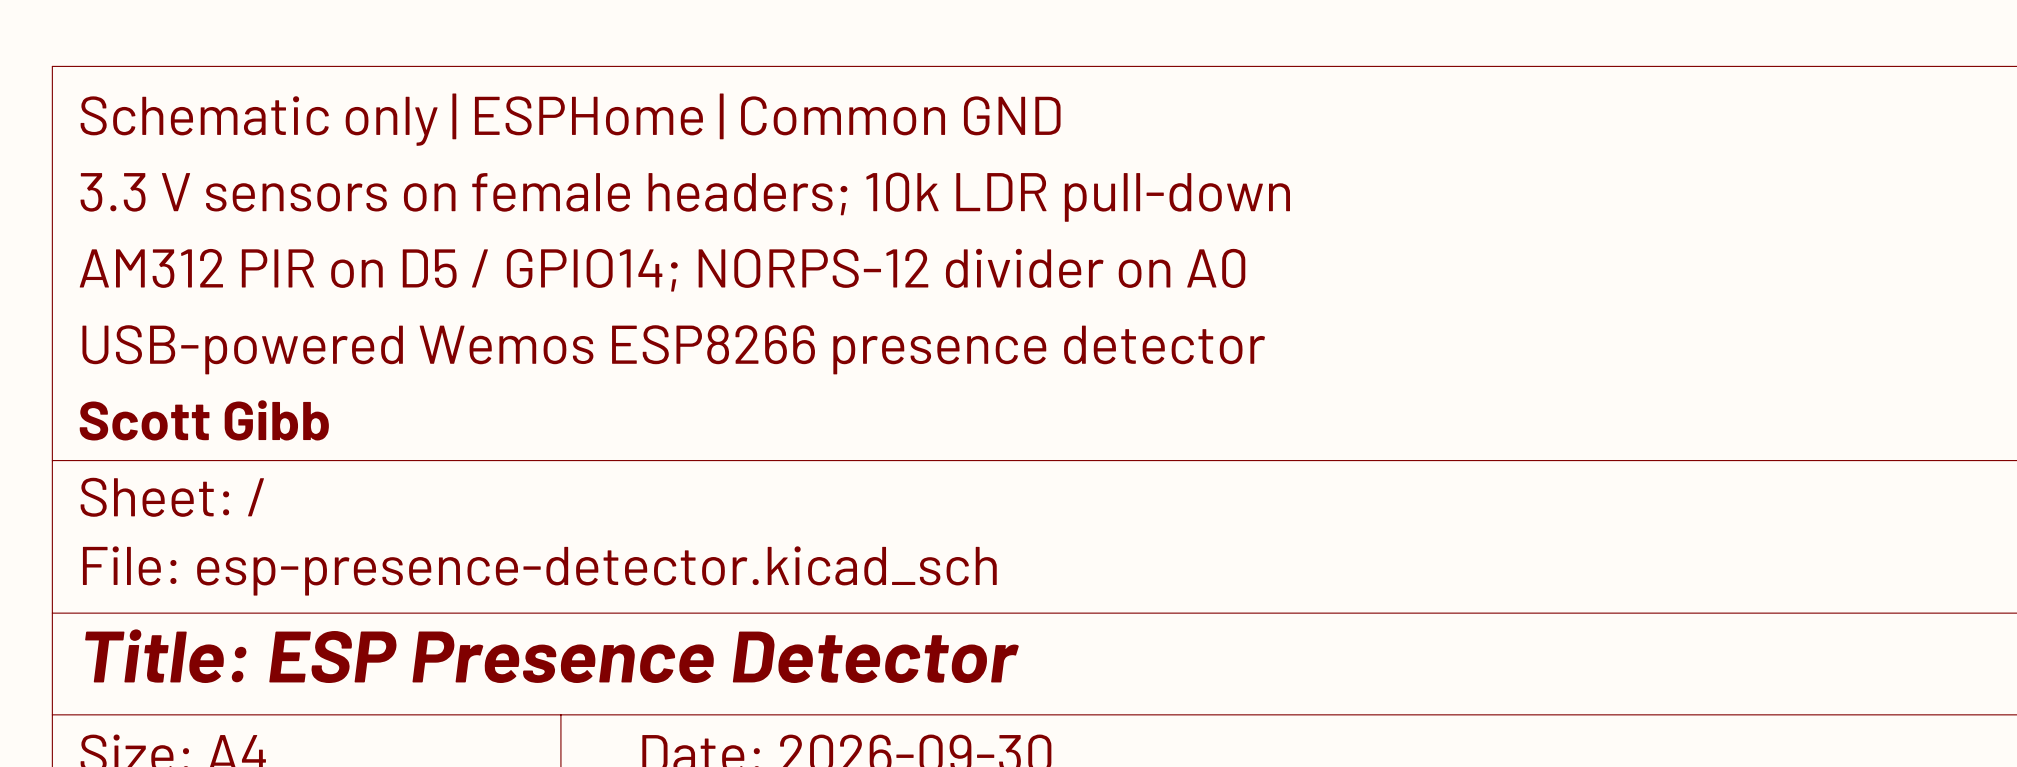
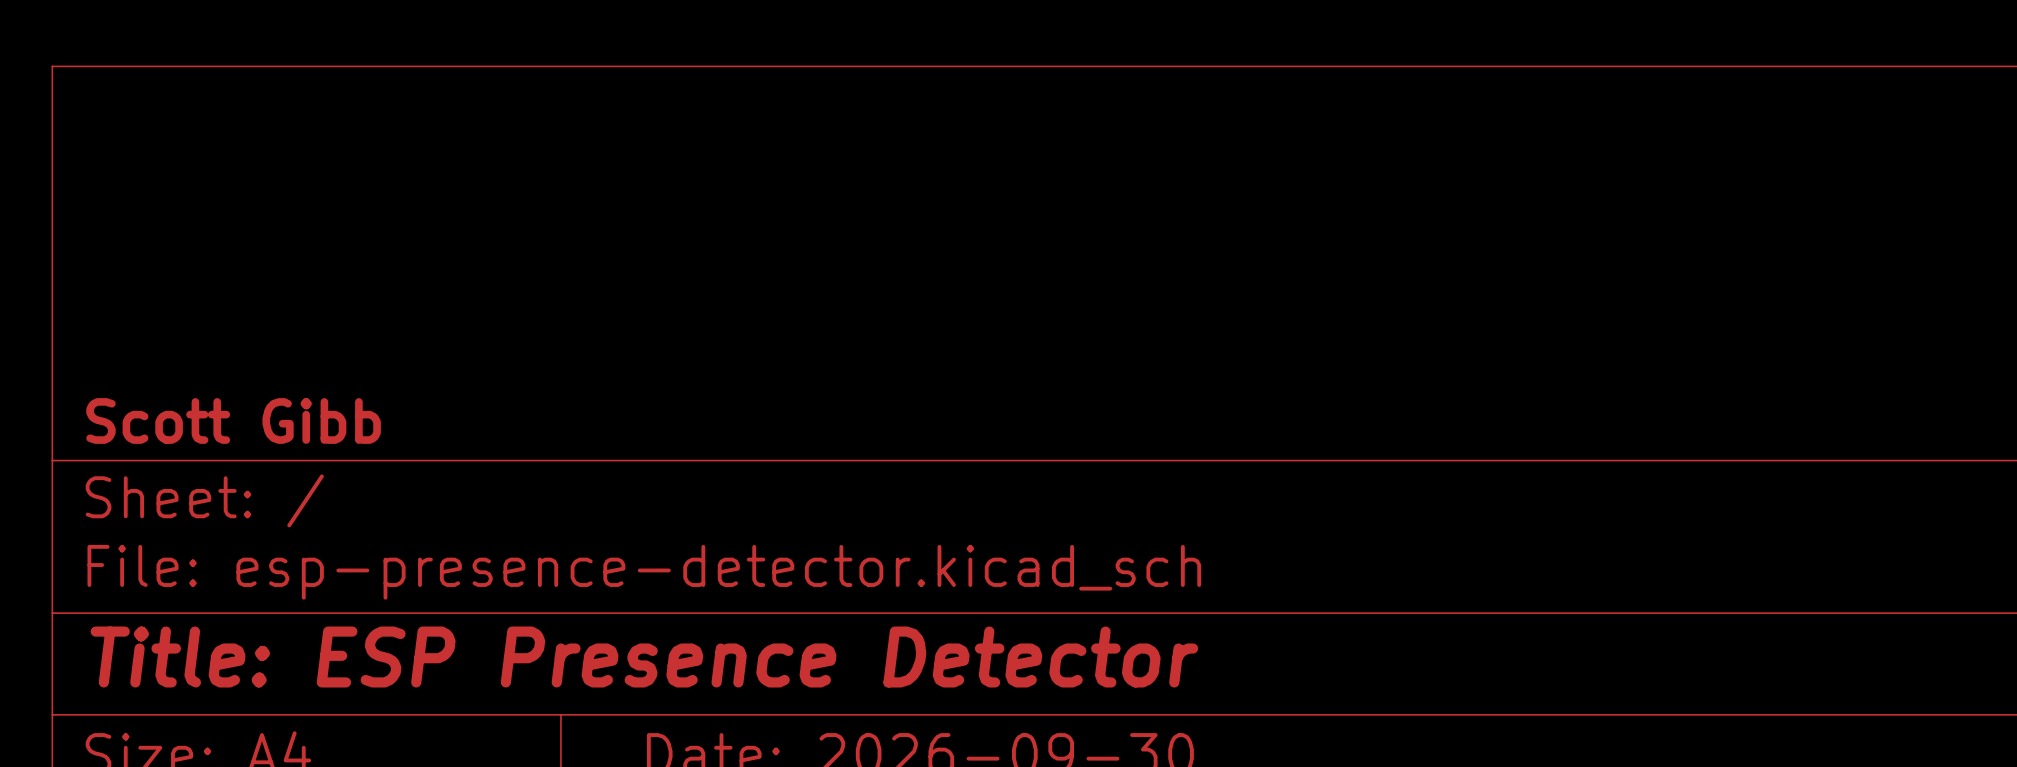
title block: Schematic only | ESPHome | Common GND (570, 119) -> none
title block: 3.3 V sensors on female headers; 10k LDR pull-down (685, 197) -> none
title block: AM312 PIR on D5 / GPIO14; NORPS-12 divider on A0 (662, 270) -> none
title block: USB-powered Wemos ESP8266 presence detector (673, 349) -> none

